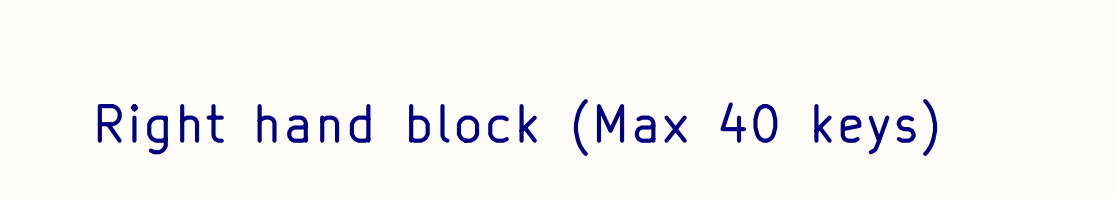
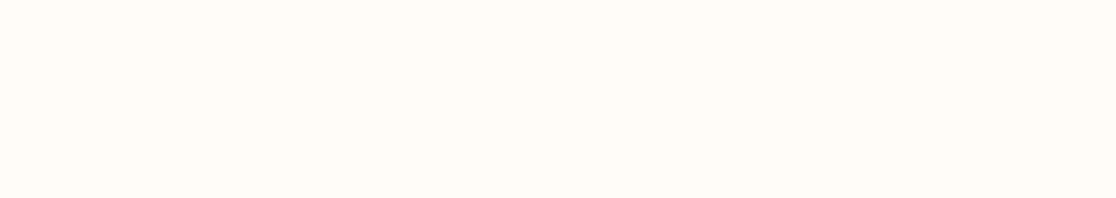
text: Right hand block (Max 40 keys) (517, 127) -> none

